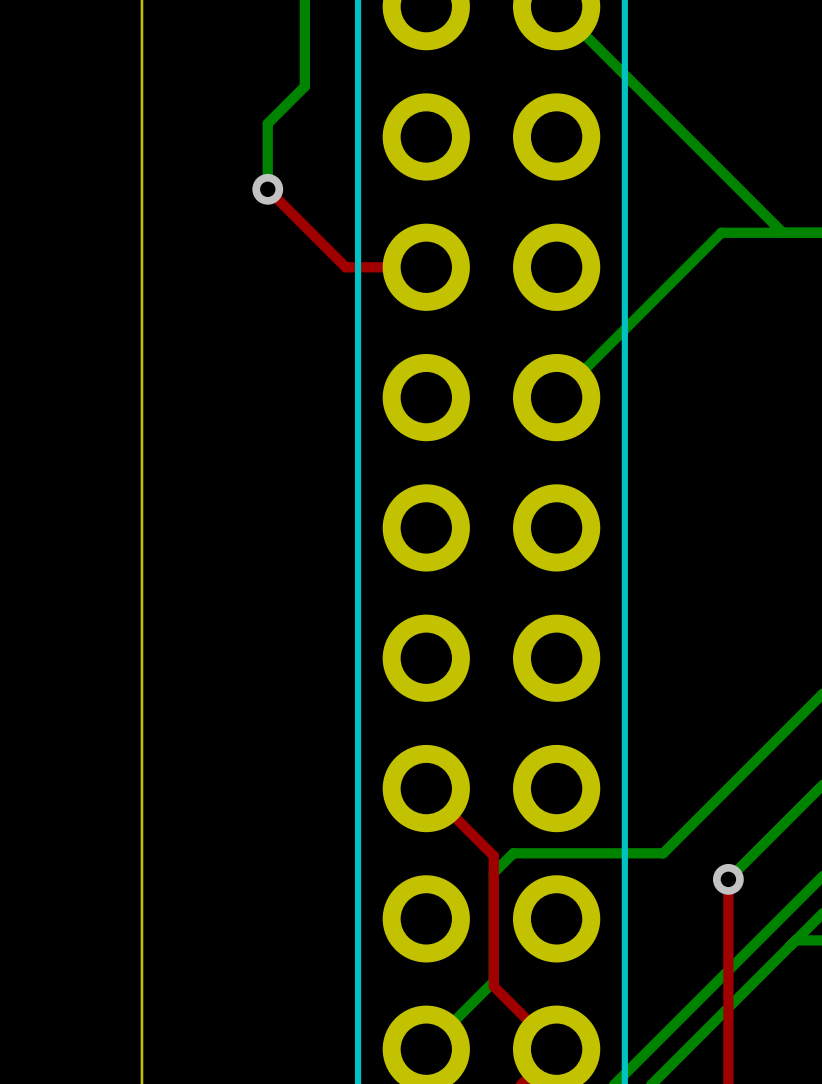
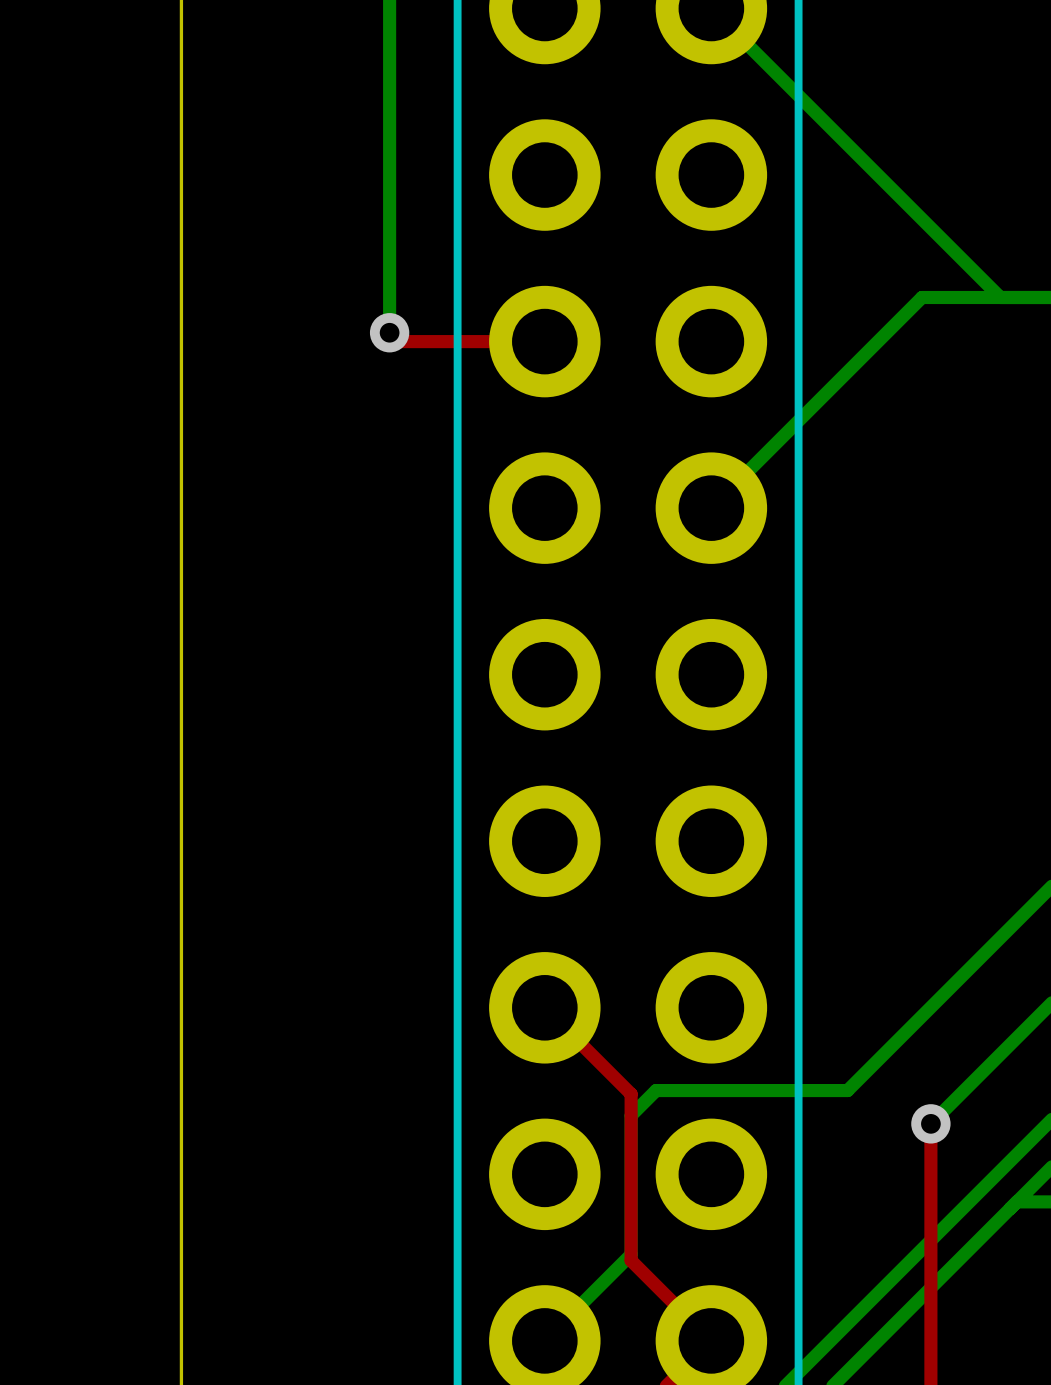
bottom track: (304, 86) (267, 123) (267, 189) -> (389, 110) (389, 332)
top track: (267, 189) (345, 267) -> (389, 332) (398, 341) (441, 341)
via position: (267, 189) -> (389, 332)

